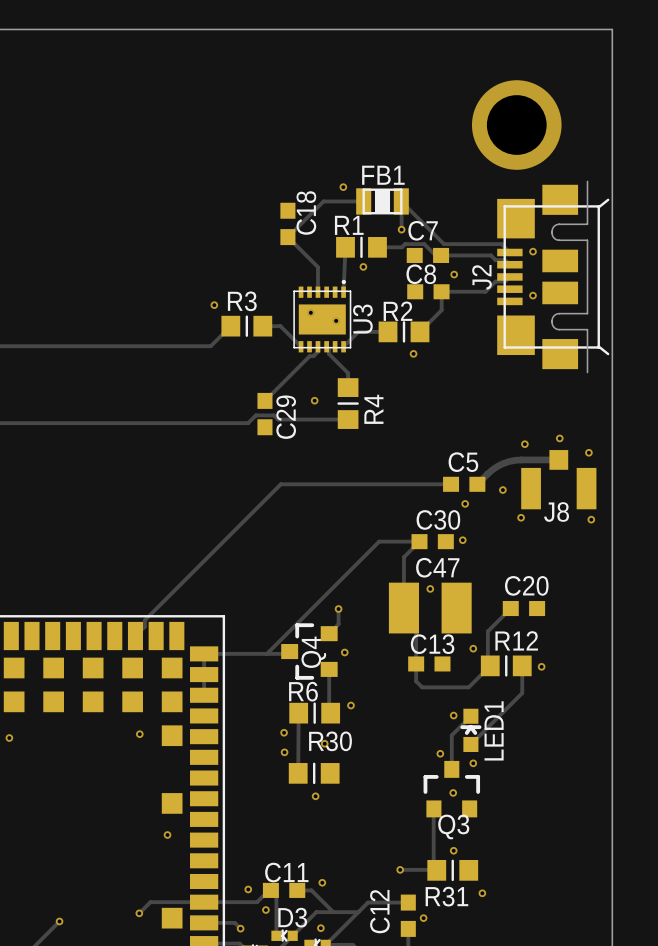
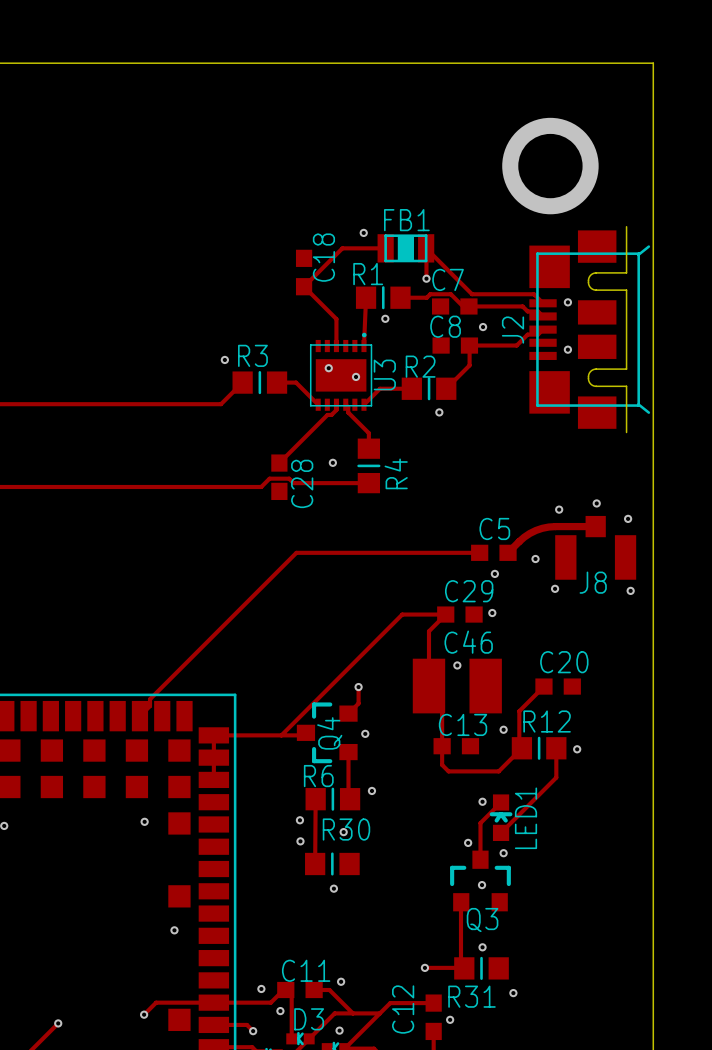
C29 name: C29 (286, 417) -> C28 (302, 483)
C30 name: C30 (438, 519) -> C29 (469, 591)
C47 name: C47 (437, 567) -> C46 (468, 642)

